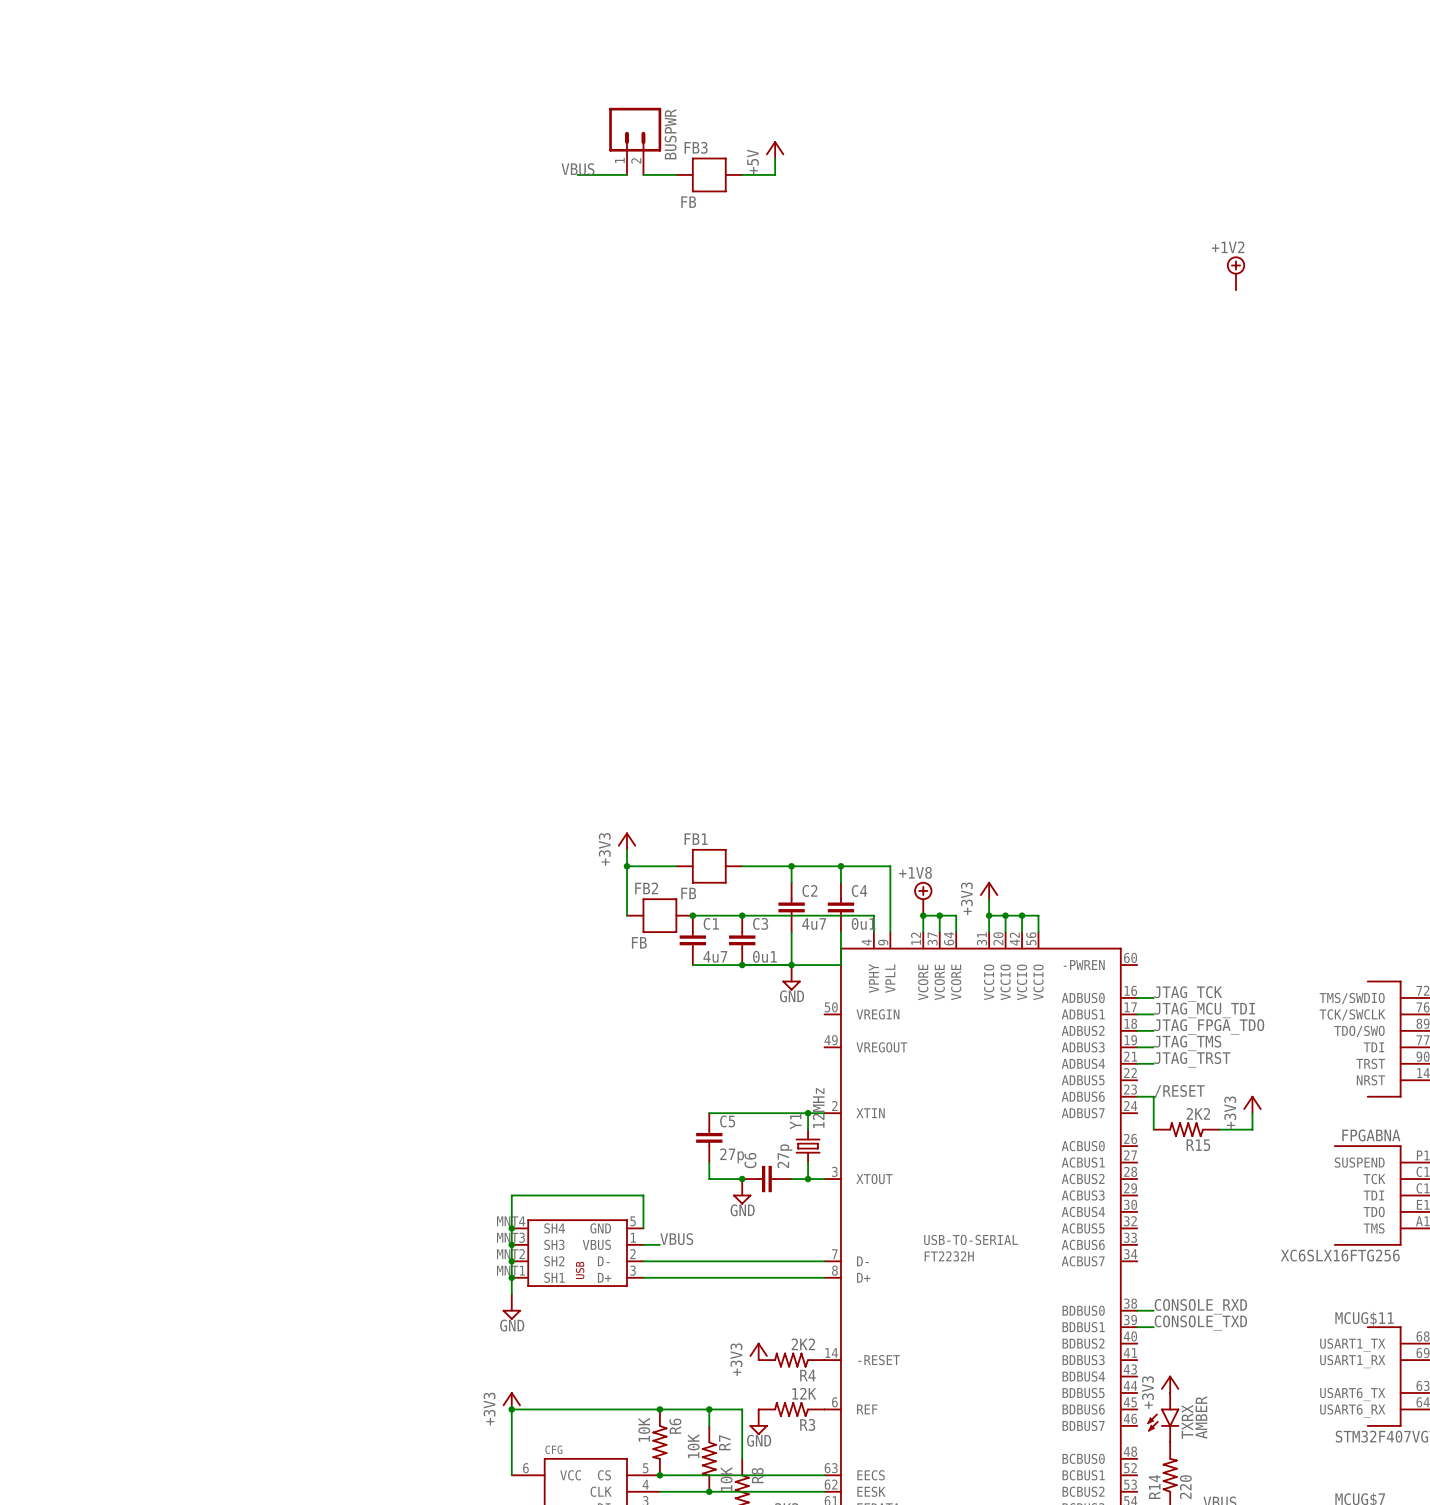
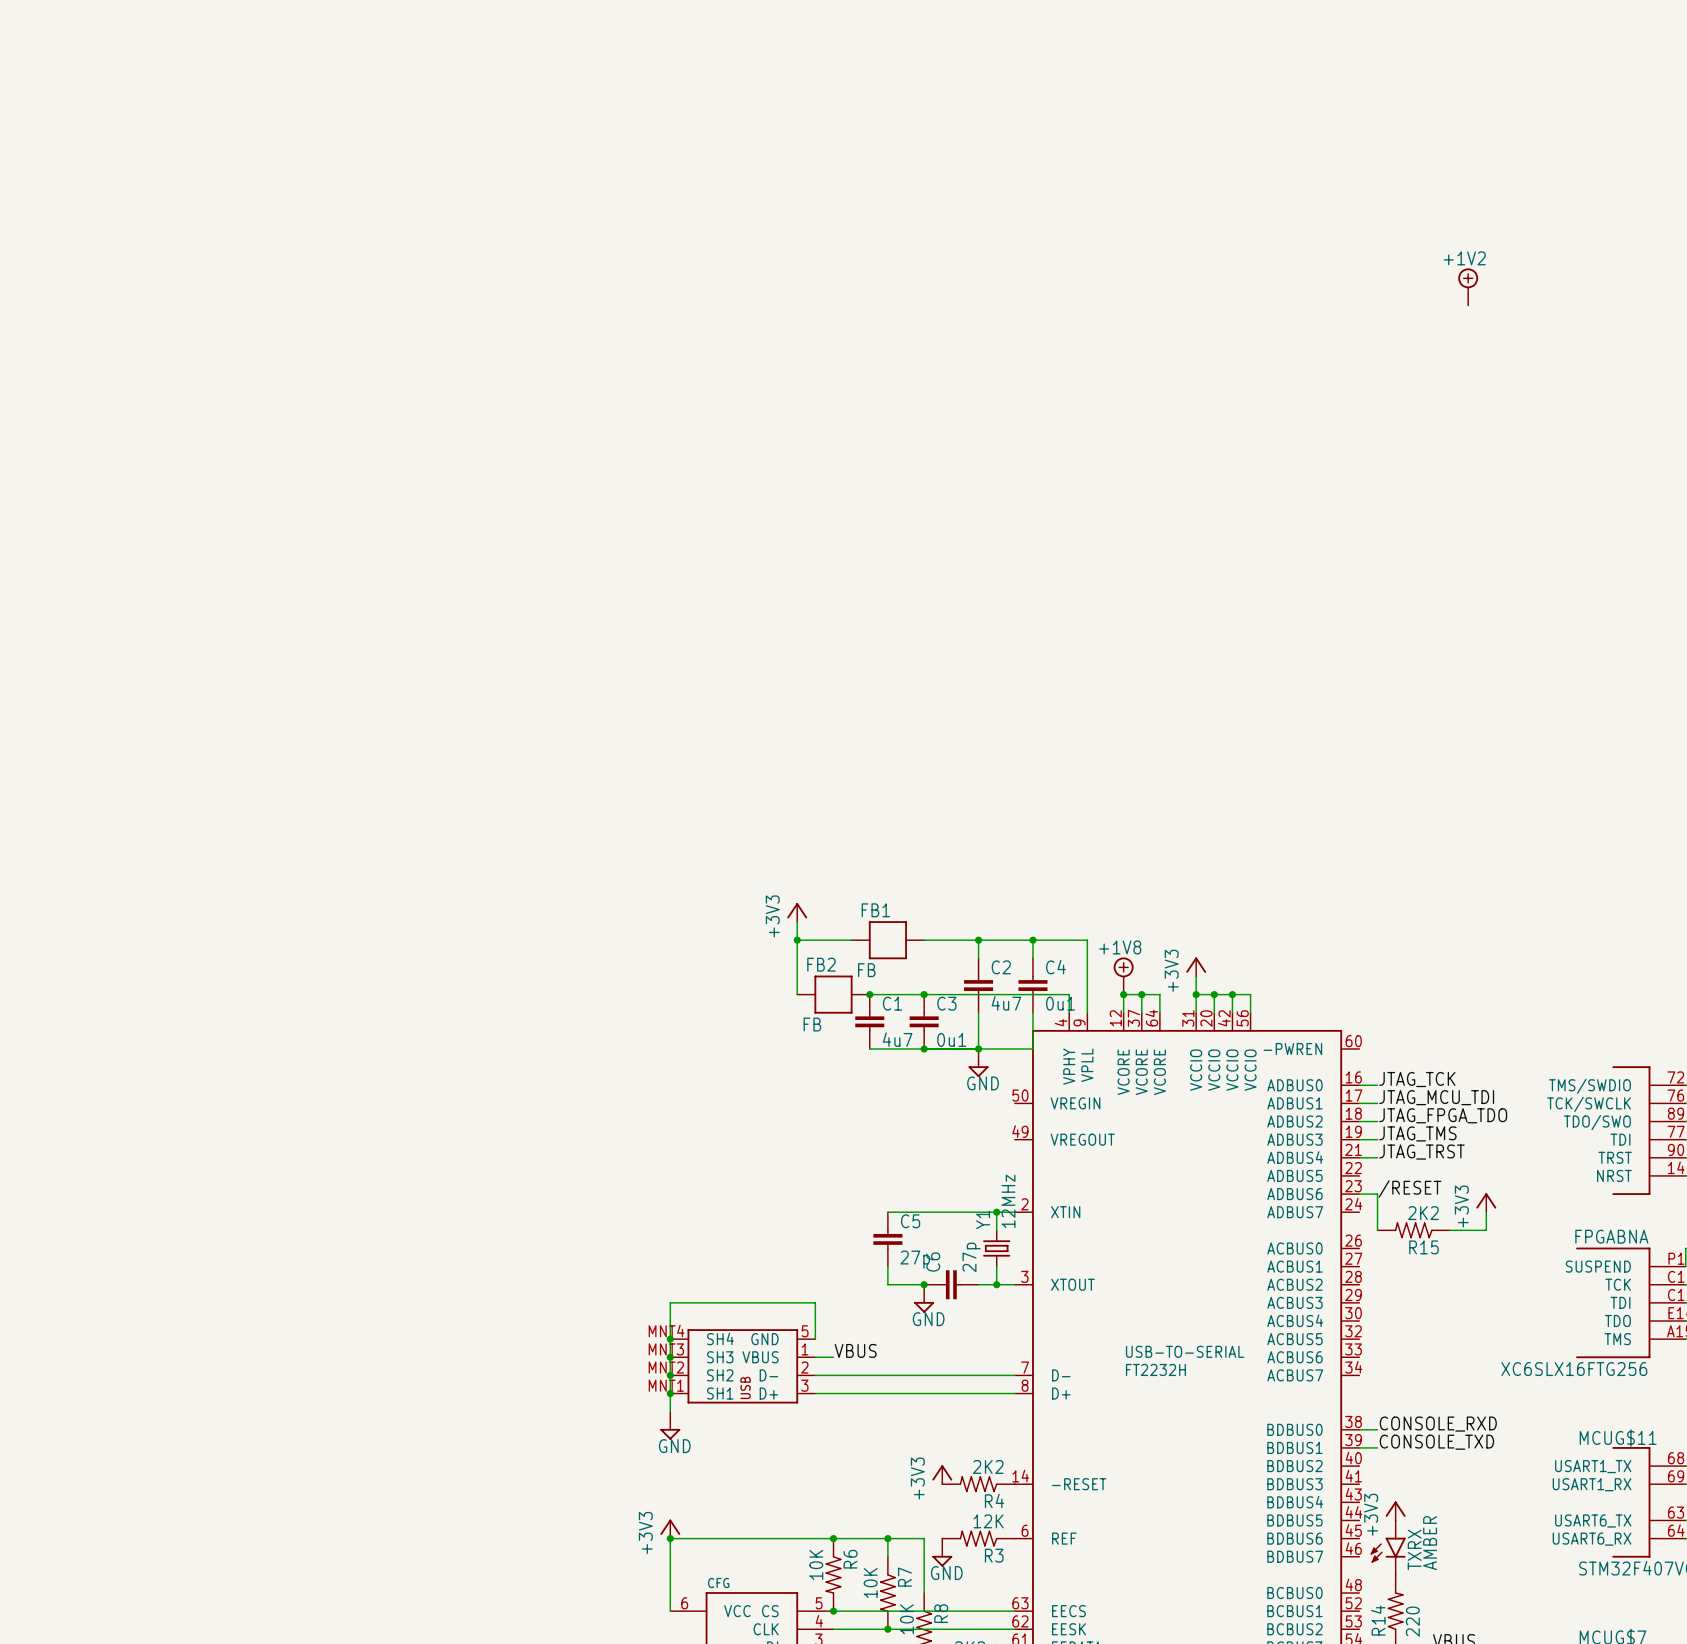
BUSPWR: (635, 141) -> none
power symbol: +5V (775, 149) -> none
wire: (775, 158) (775, 174) (742, 174) -> none
label: VBUS (578, 169) -> none
wire: (577, 174) (626, 174) -> none
wire: (643, 174) (676, 174) -> none
FB3: FB (709, 174) -> none

